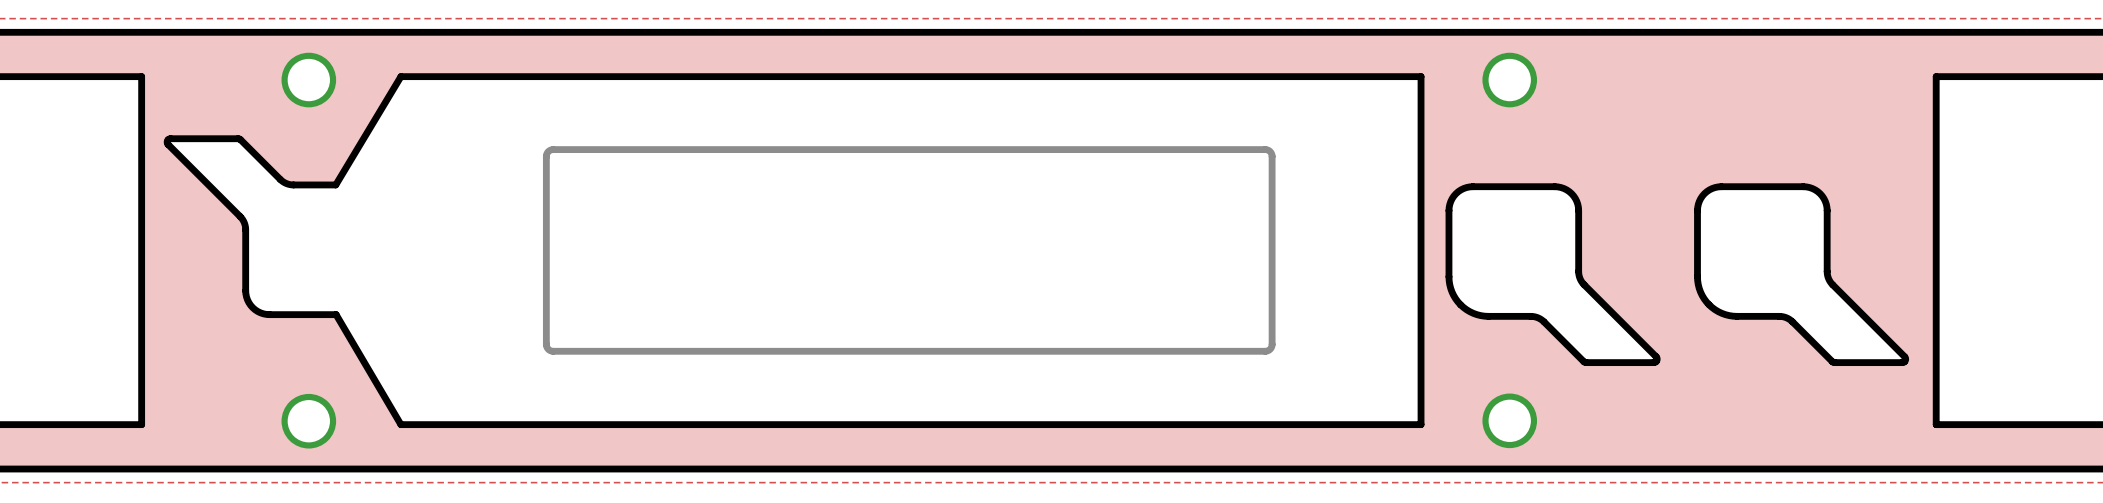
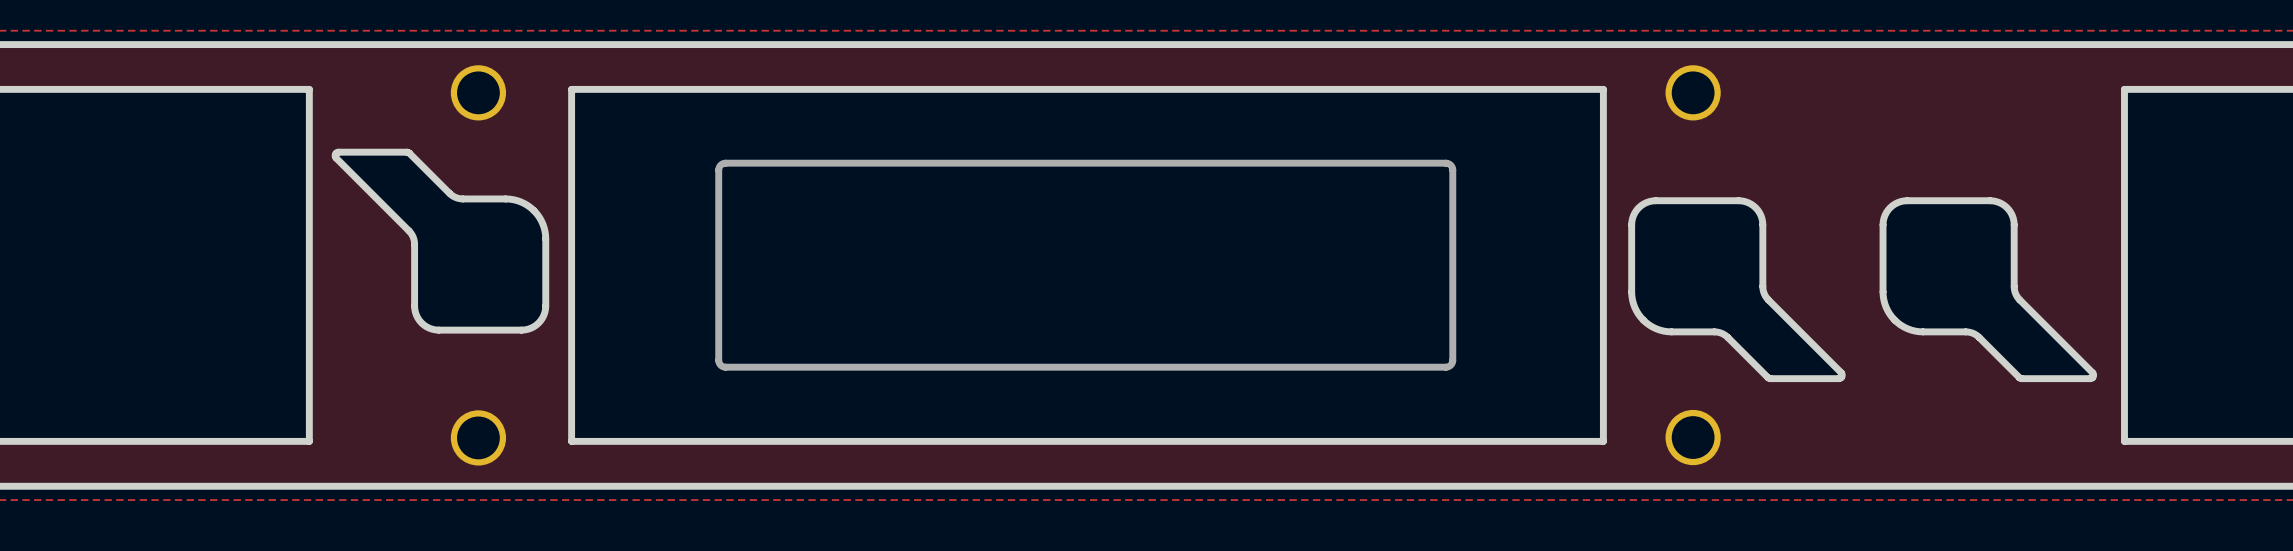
board edge: (400, 76) (335, 184) -> (506, 330) (530, 328) (538, 323) (543, 315) (545, 305) (545, 238) (542, 223) (534, 210) (521, 202) (505, 198)
board edge: (336, 314) (400, 424) -> (571, 89) (571, 441)

